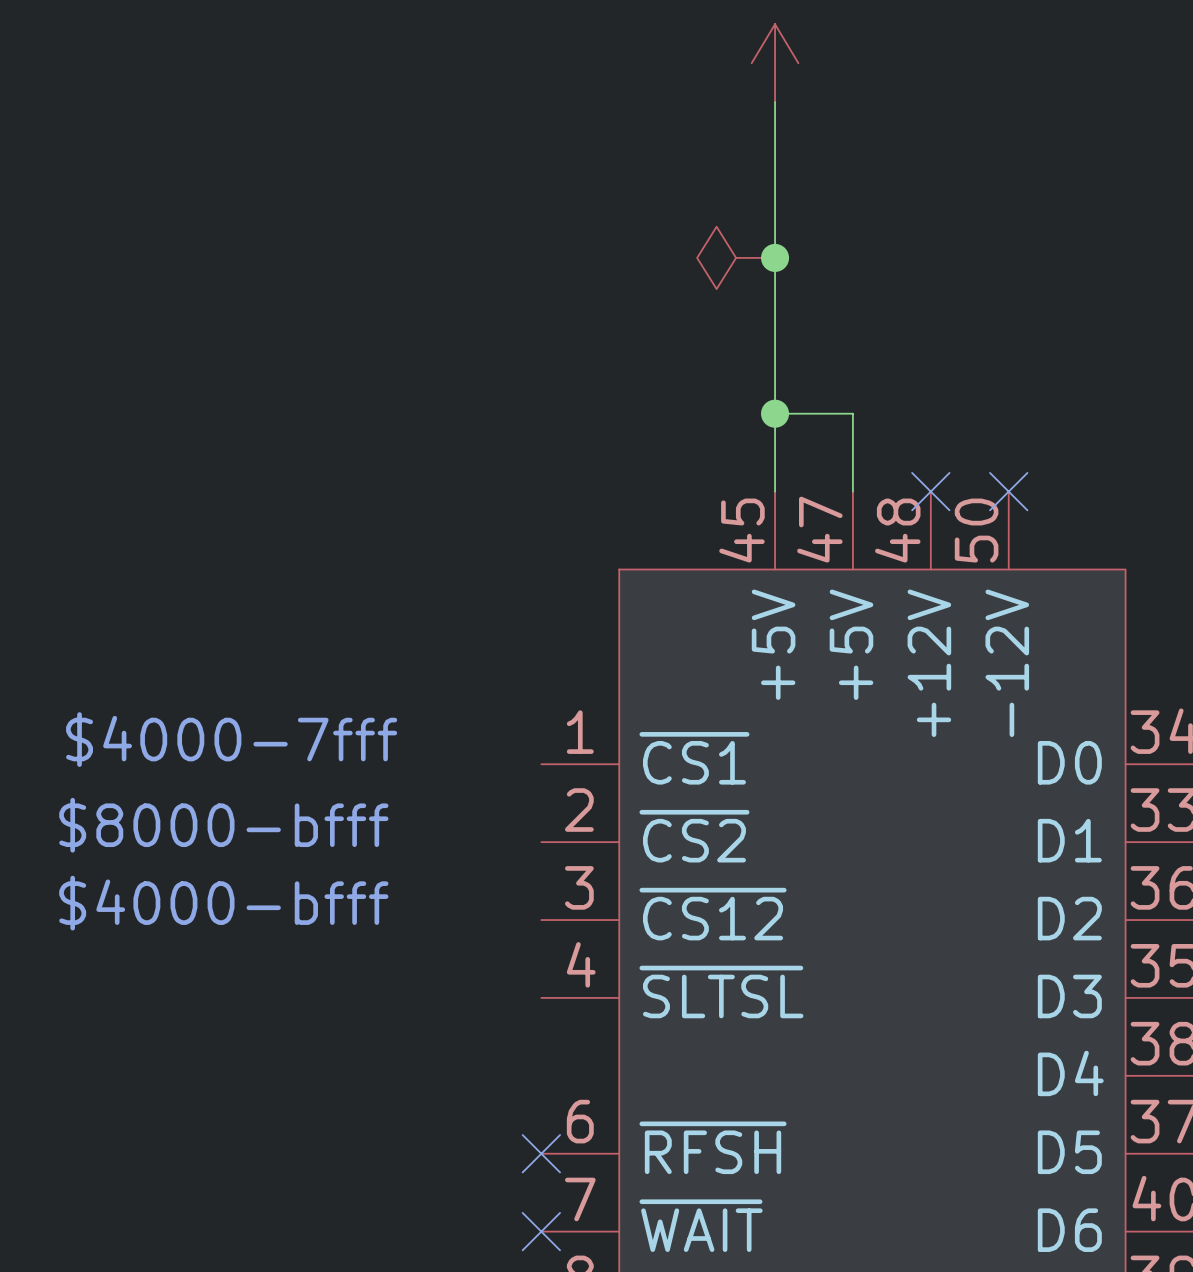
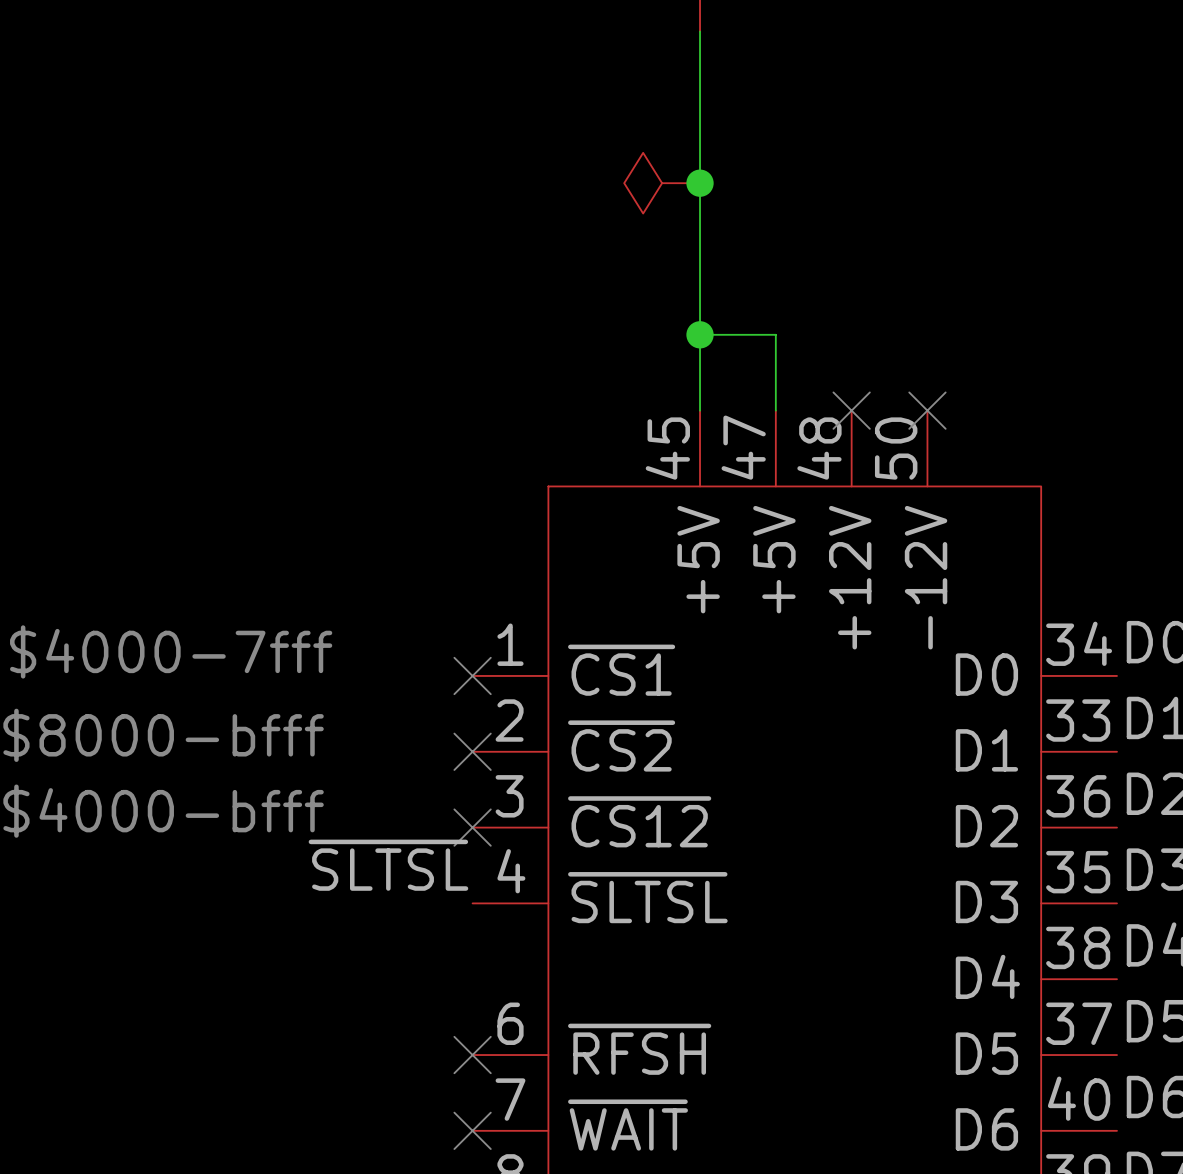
no-connect mark: none -> (472, 675)
no-connect mark: none -> (472, 751)
no-connect mark: none -> (472, 827)
label: none -> ~{SLTSL} (388, 865)

